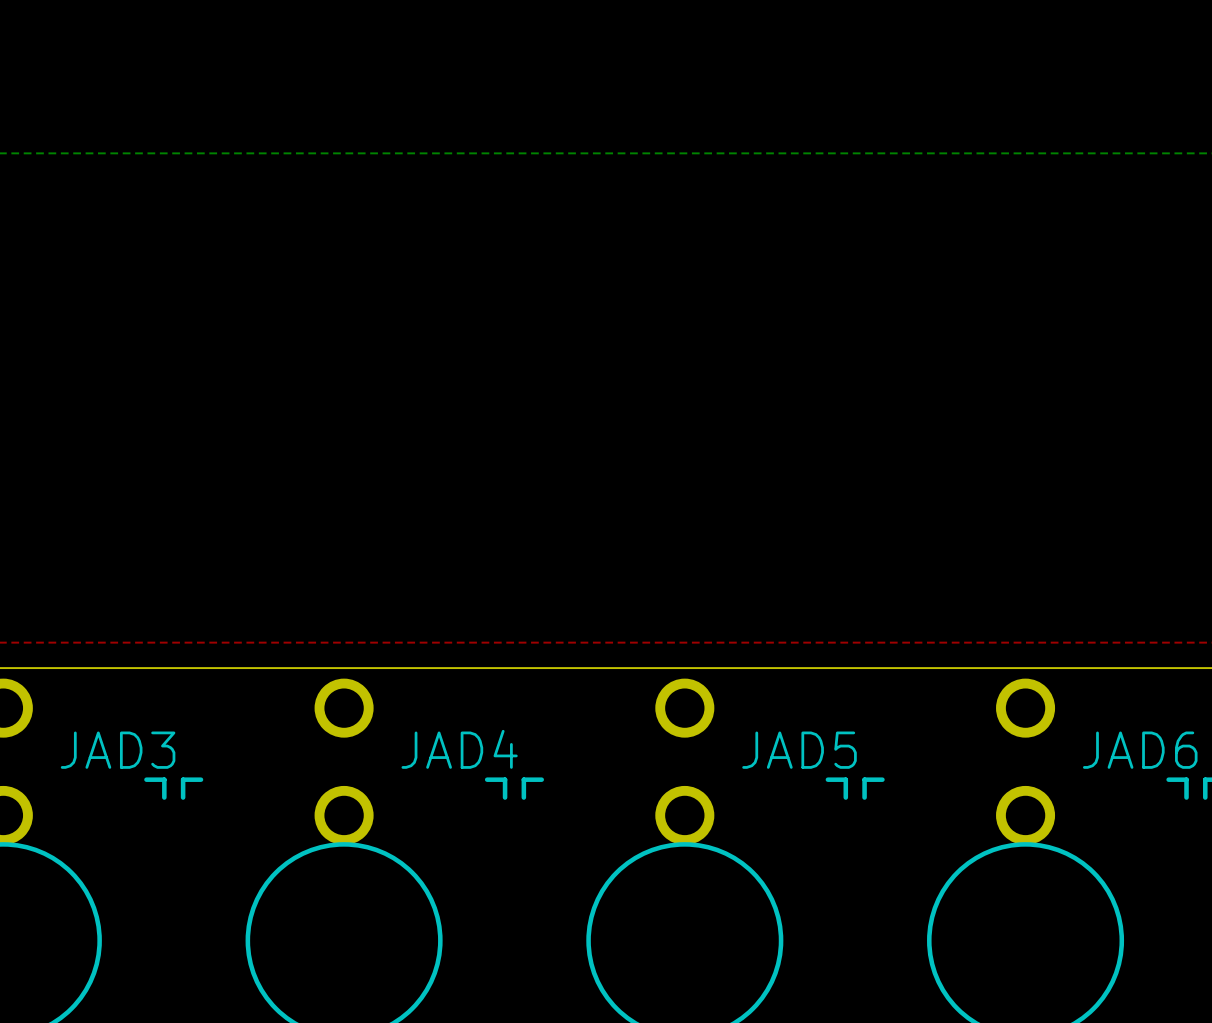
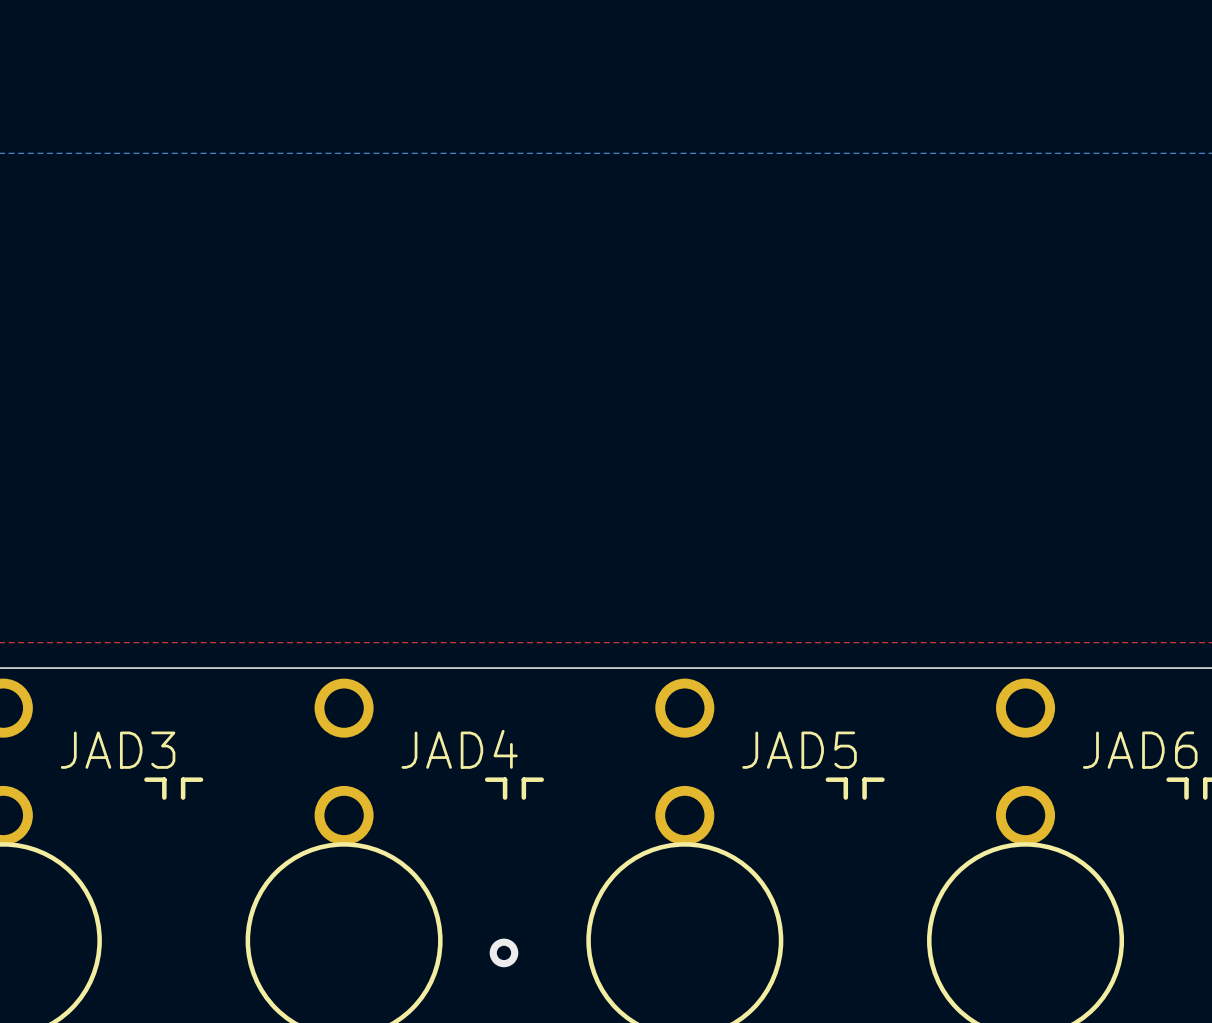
via: none -> (503, 952)

